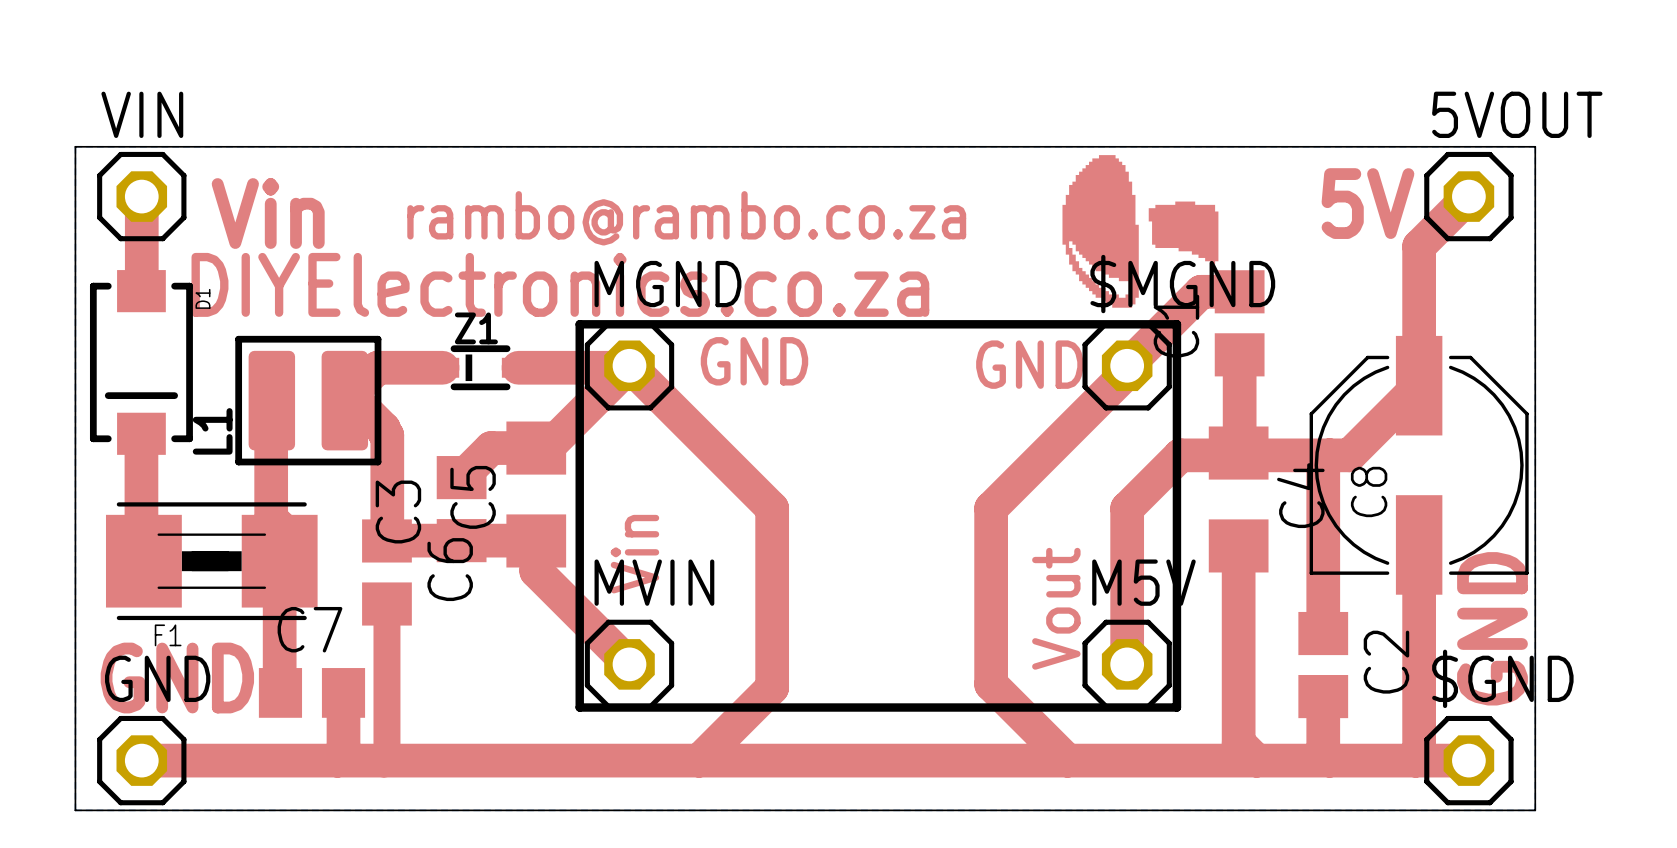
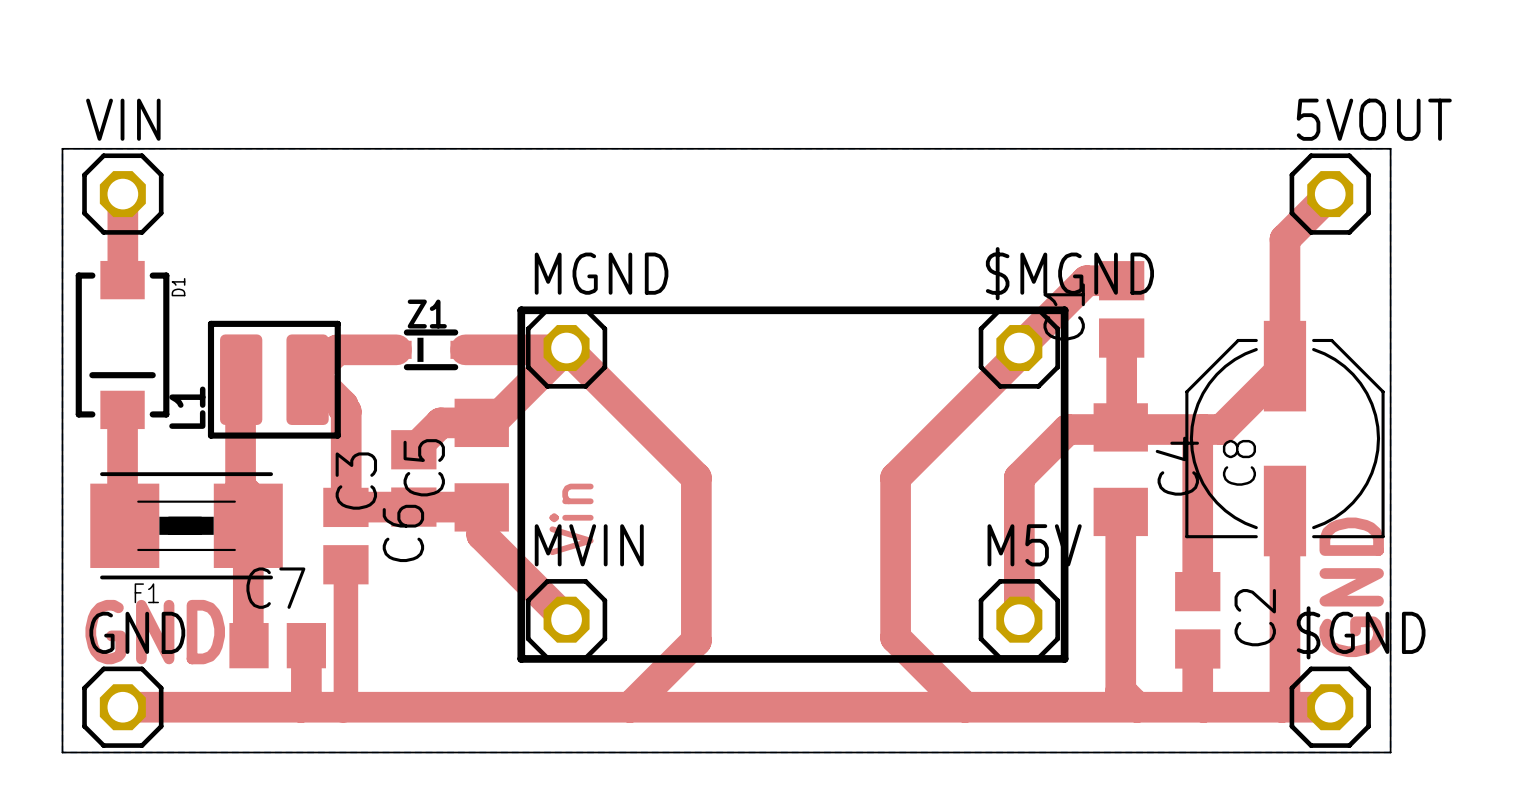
drawing: [1062, 155, 1219, 308] -> none
text: 5V (1367, 203) -> none
text: Vin (268, 213) -> none
text: rambo@rambo.co.za (686, 218) -> none
text: DIYElectronics.co.za (560, 284) -> none
text: GND (754, 361) -> none
text: GND (1029, 364) -> none
text: Vout (1056, 608) -> none

